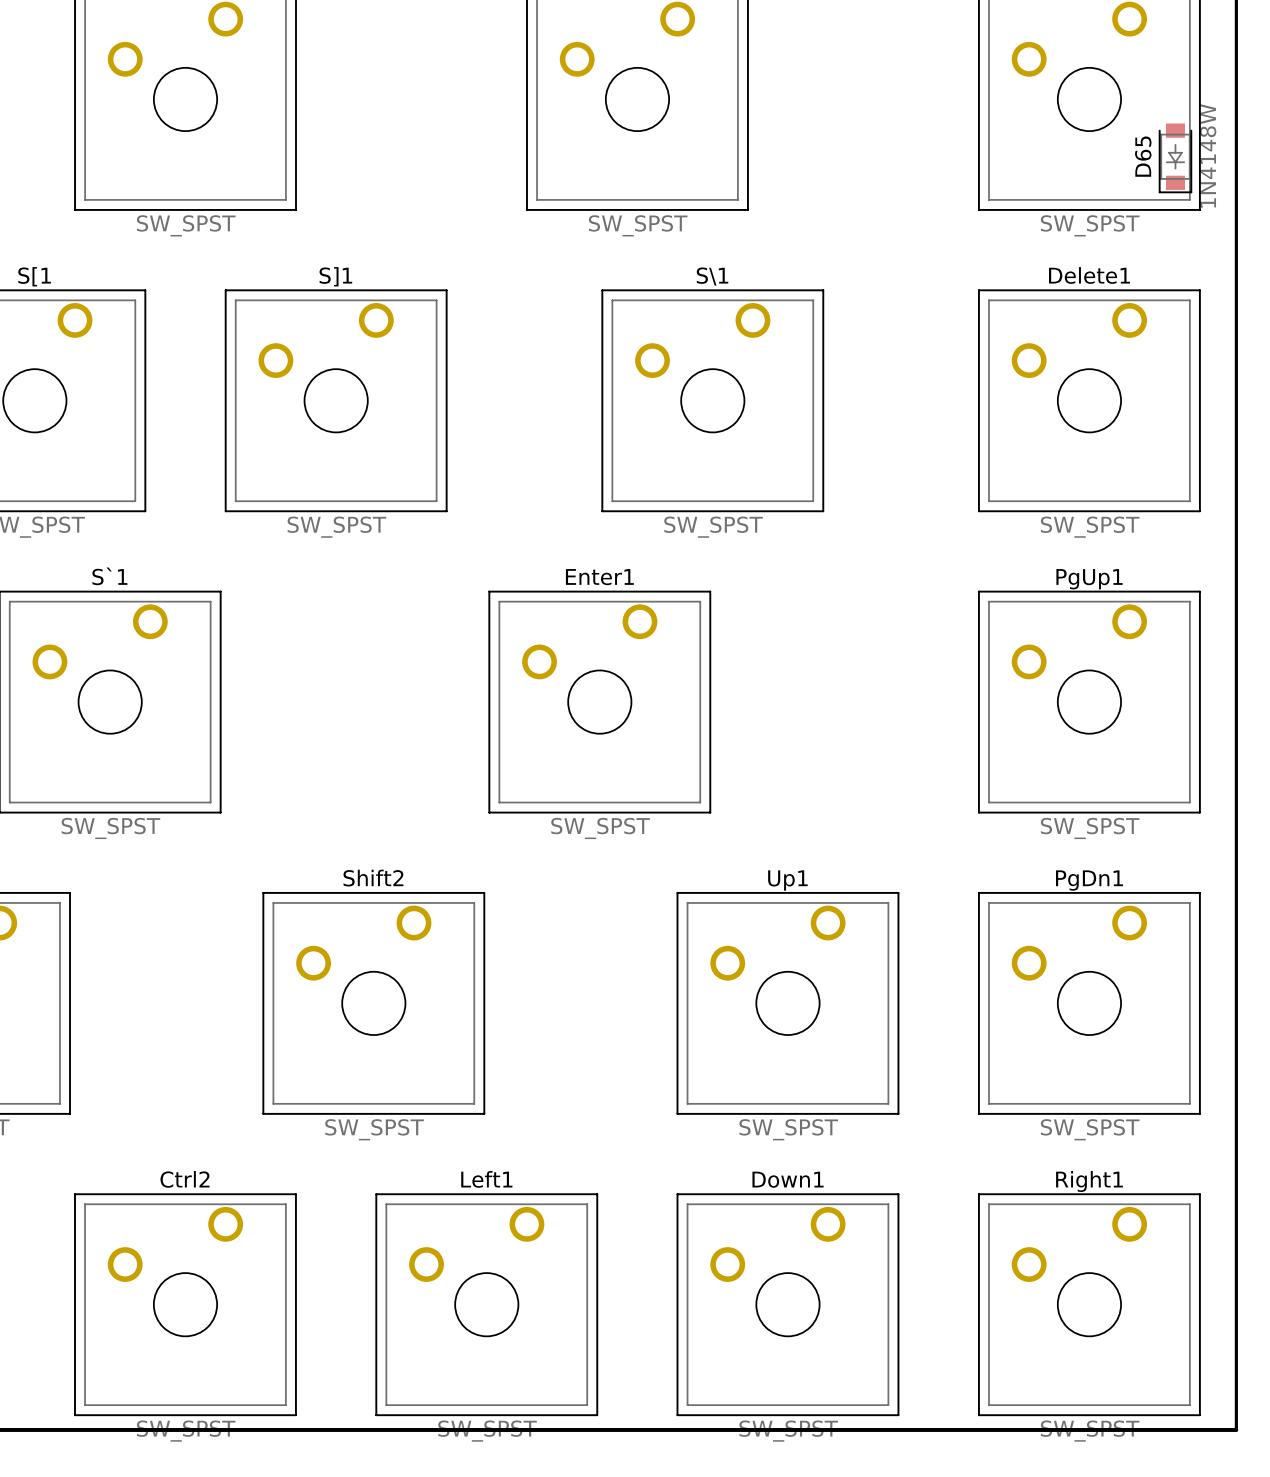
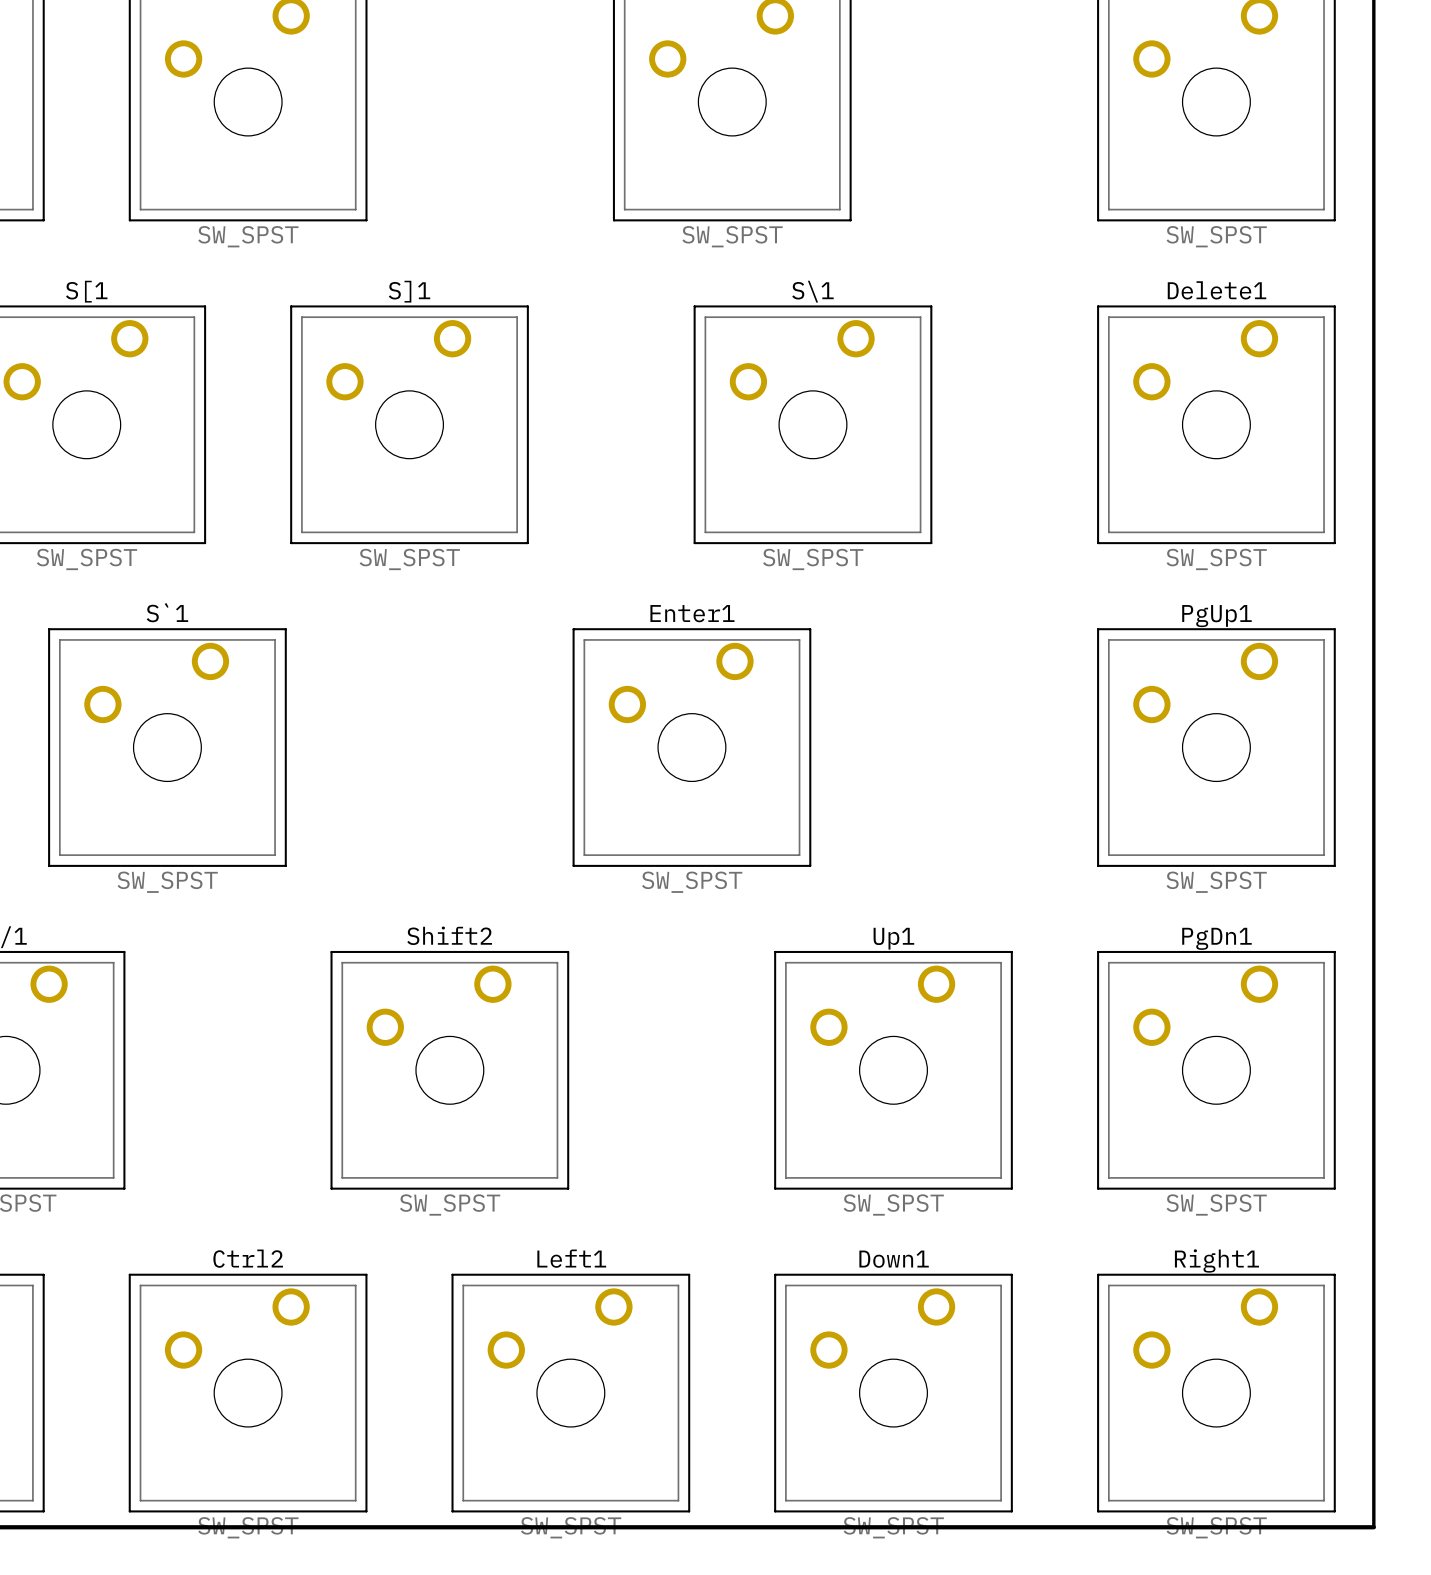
D65: 1N4148W (1175, 158) -> none

